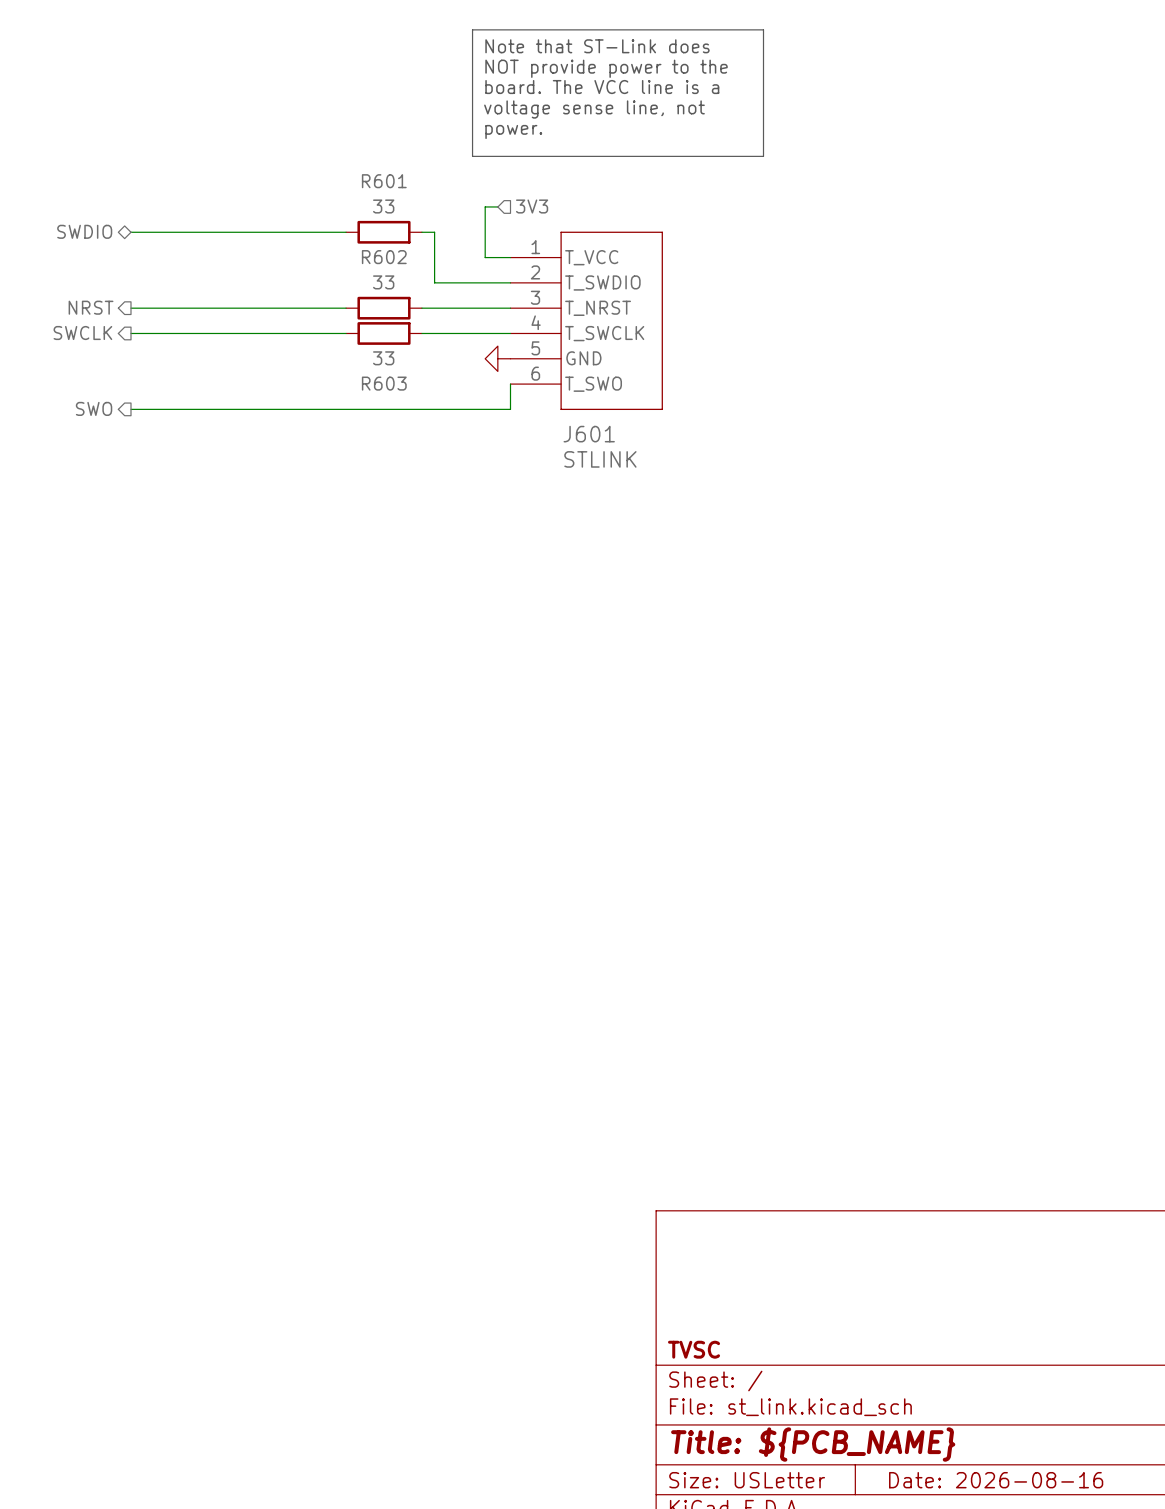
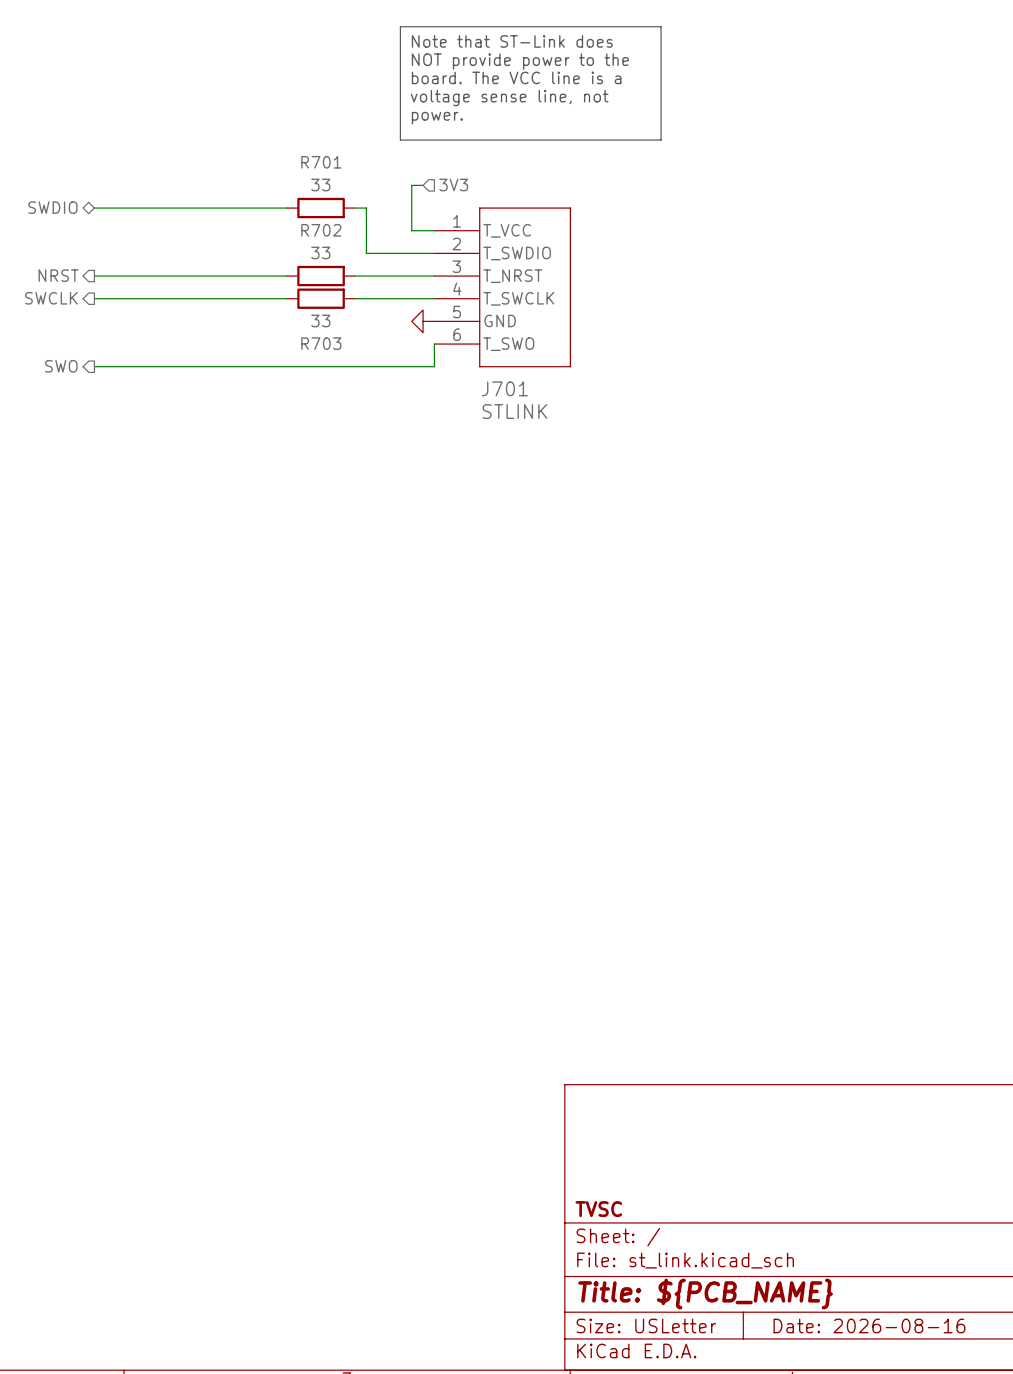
R601 name: R601 (384, 181) -> R701 (321, 162)
R602 name: R602 (384, 257) -> R702 (321, 230)
R603 name: R603 (384, 383) -> R703 (321, 343)
J601 name: J601 (589, 434) -> J701 (504, 388)

